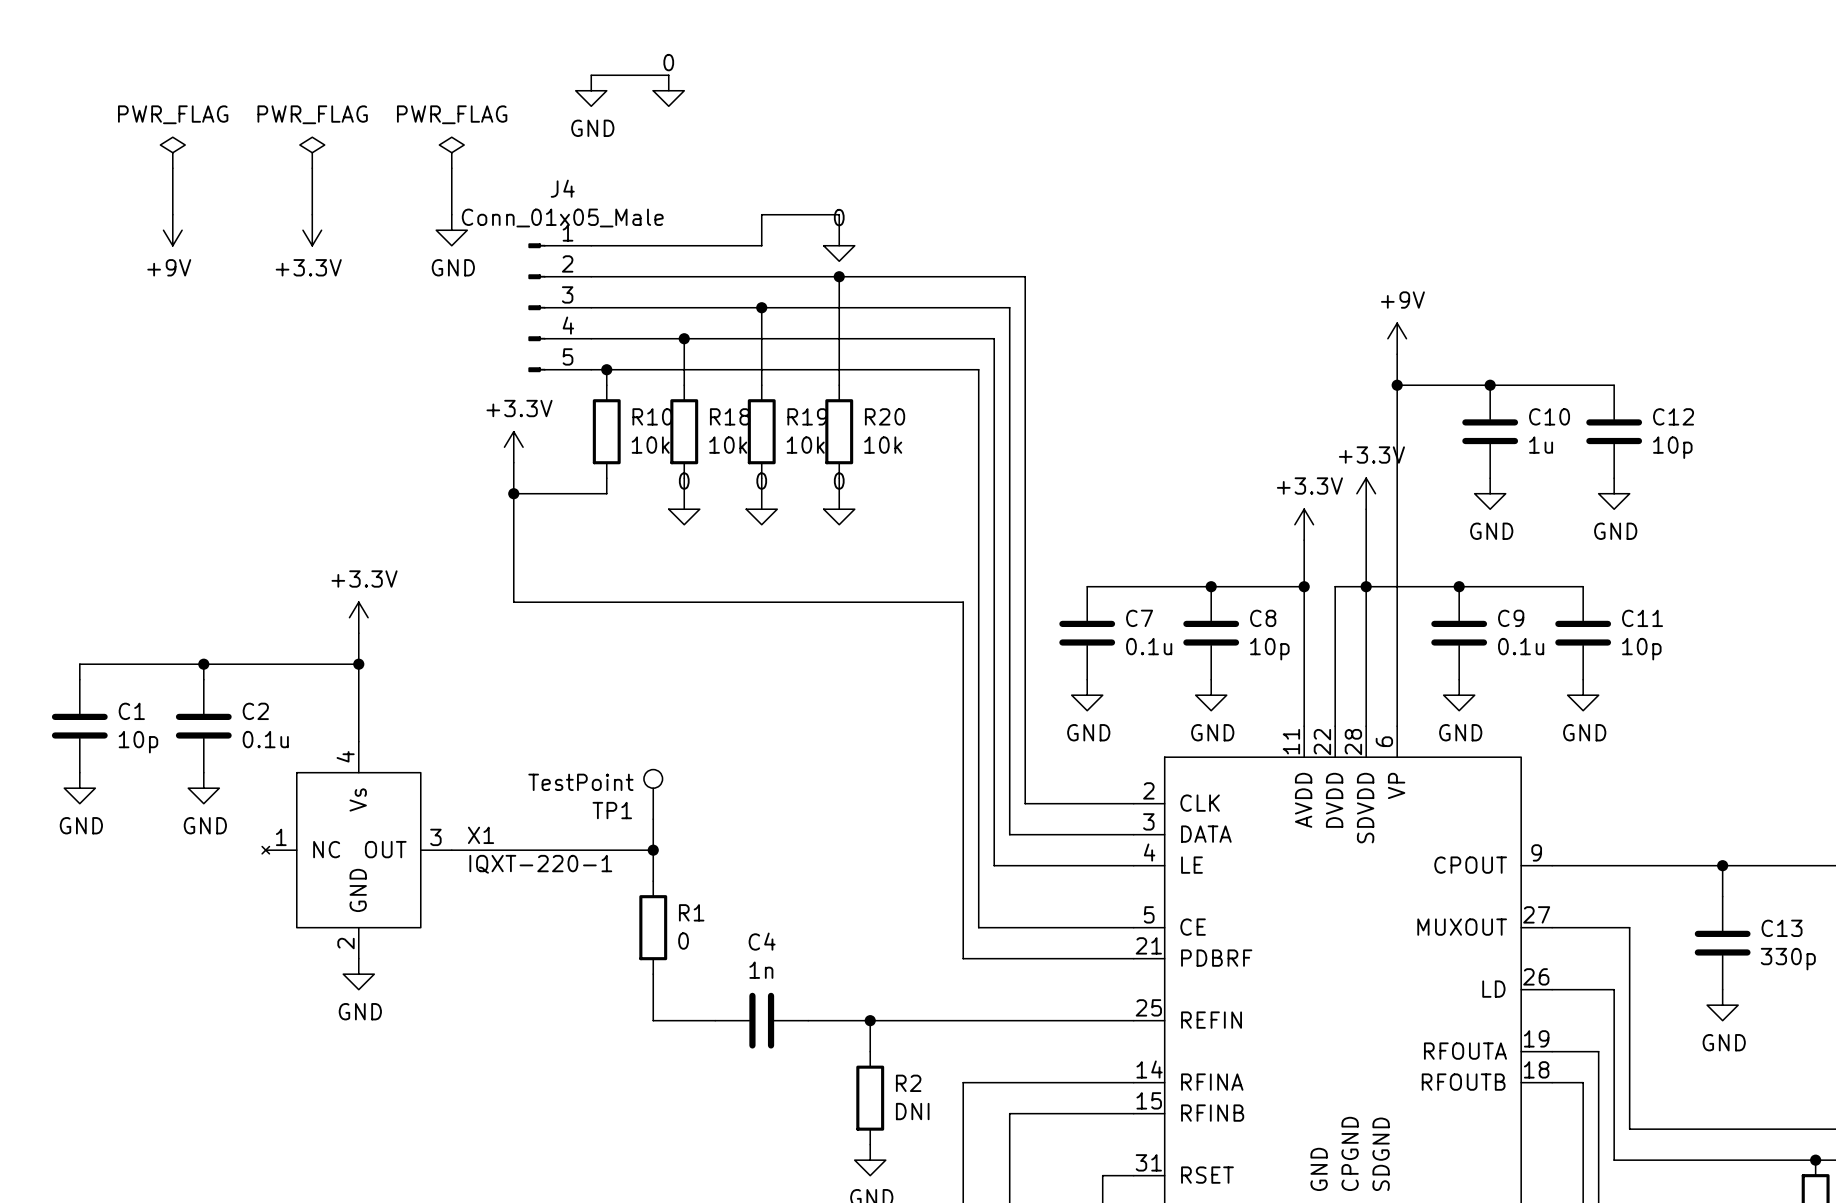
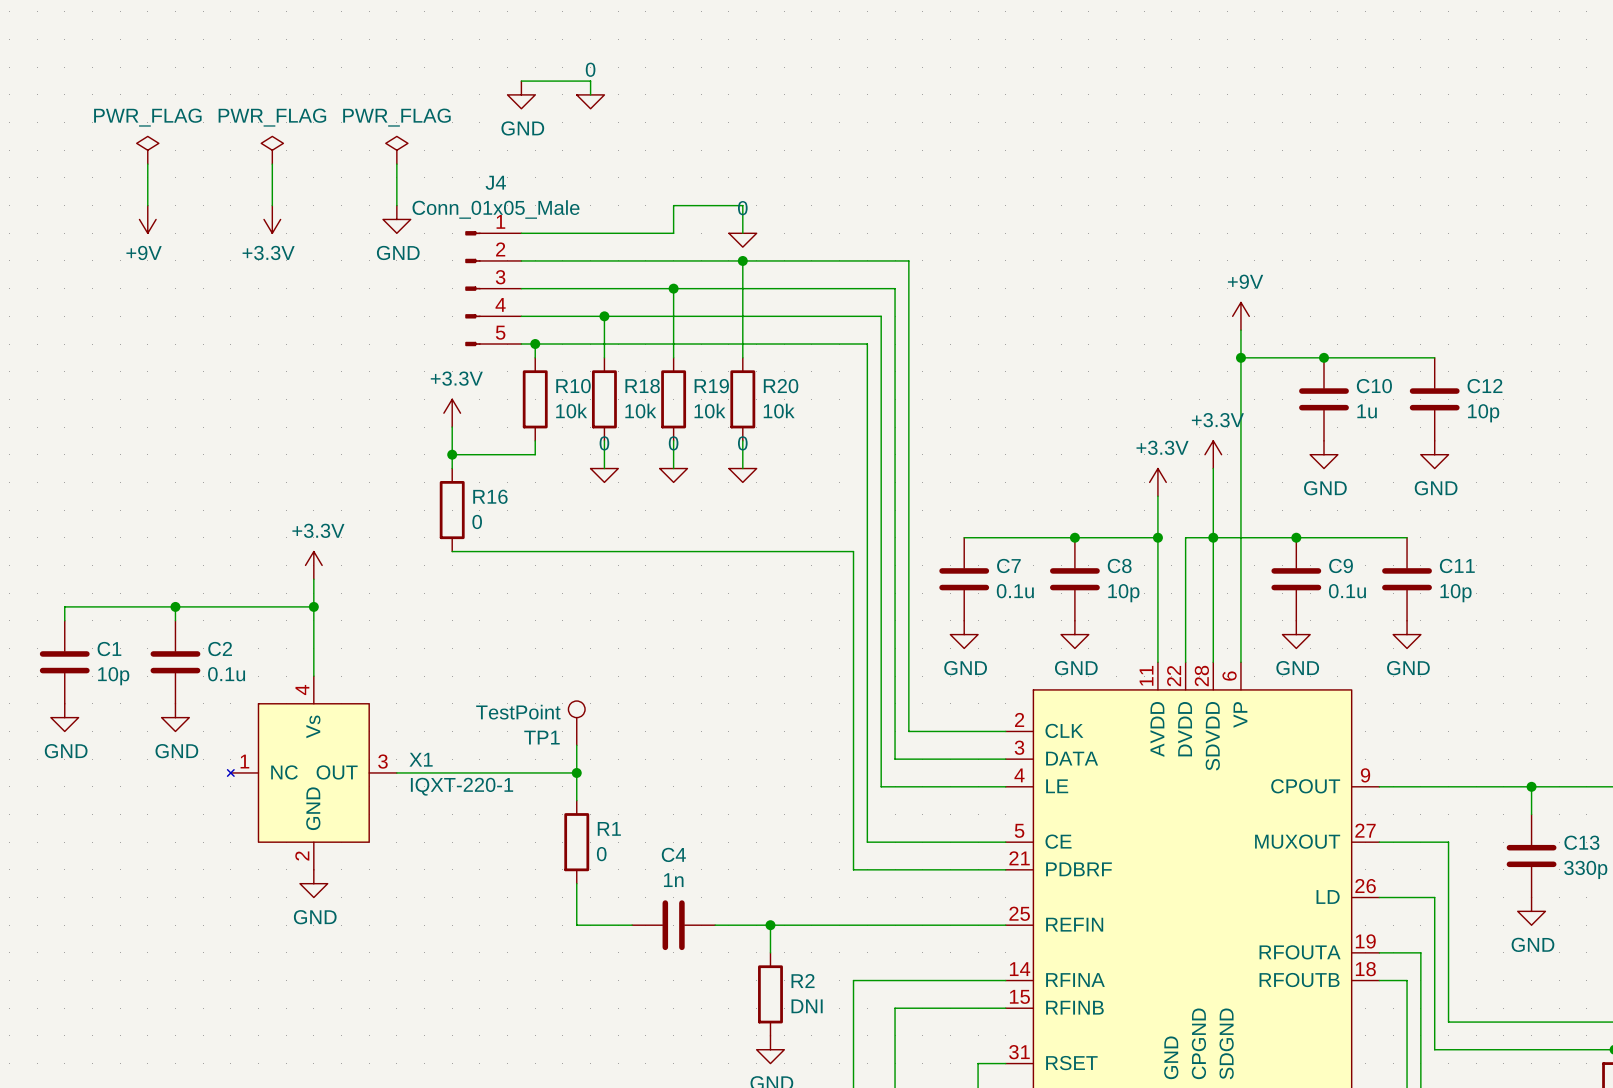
wire: (513, 509) (513, 602) -> none
R16: none -> 0 (452, 510)

